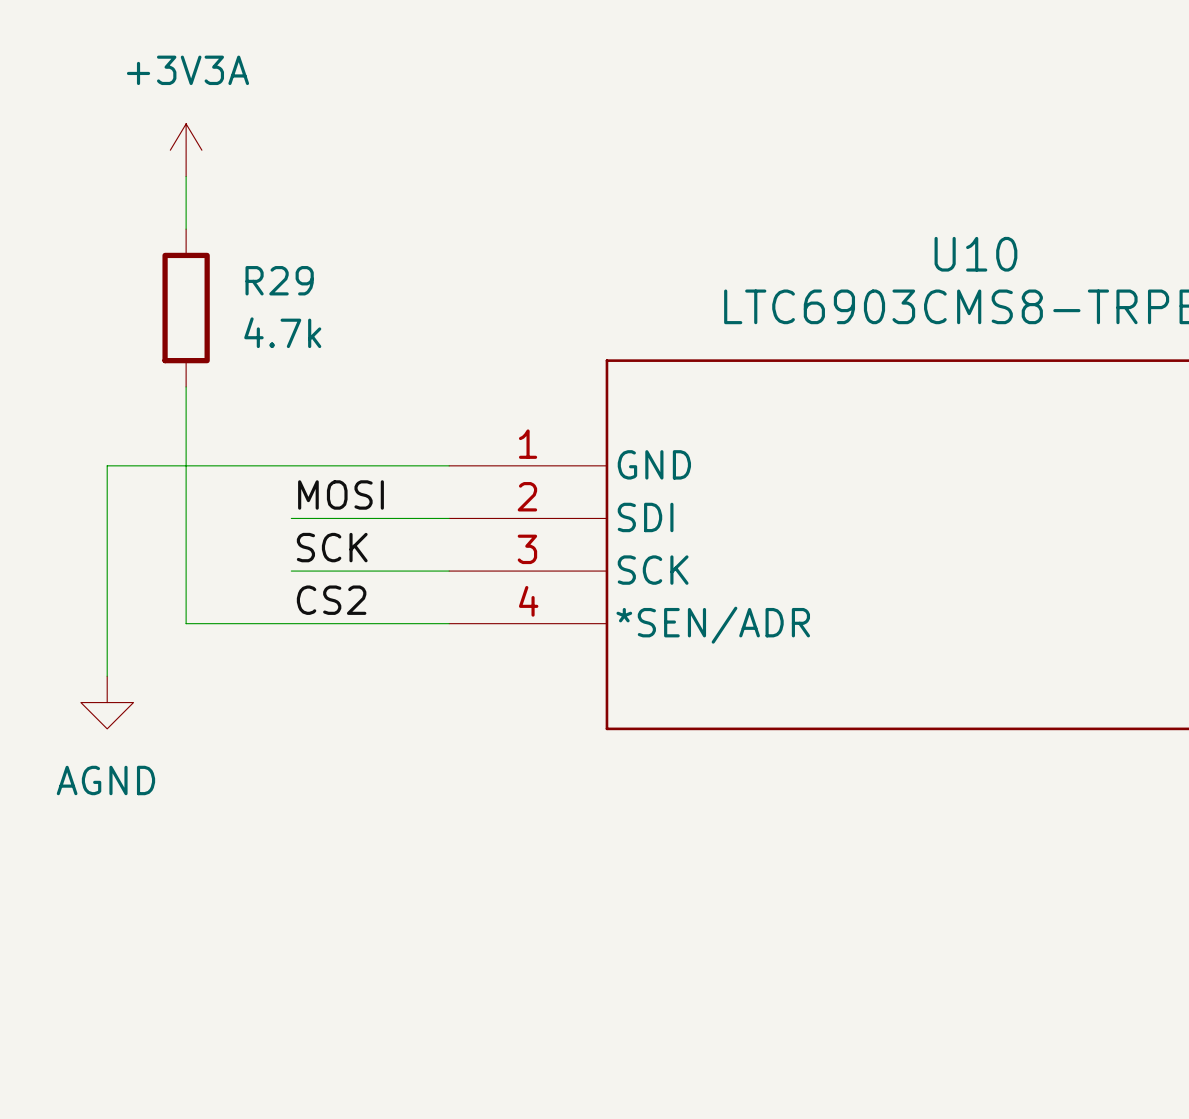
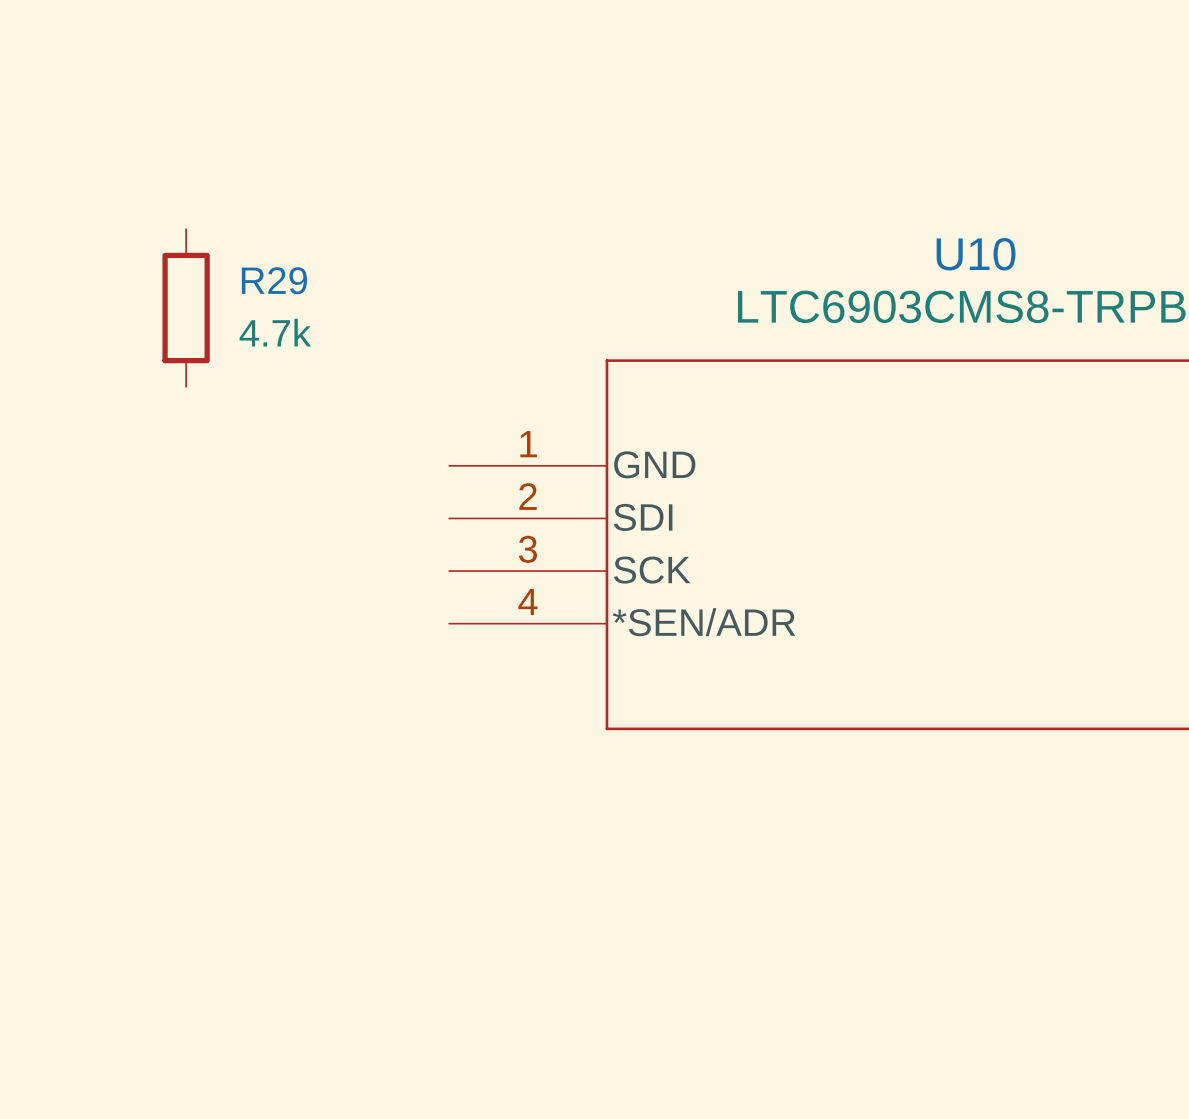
power symbol: +3V3A (186, 150) -> none
wire: (186, 176) (186, 229) -> none
wire: (186, 386) (186, 623) (449, 623) -> none
wire: (449, 465) (107, 465) (107, 676) -> none
label: MOSI (341, 494) -> none
wire: (291, 518) (449, 518) -> none
label: SCK (332, 547) -> none
wire: (291, 571) (449, 571) -> none
label: CS2 (331, 600) -> none
power symbol: AGND (107, 702) -> none

